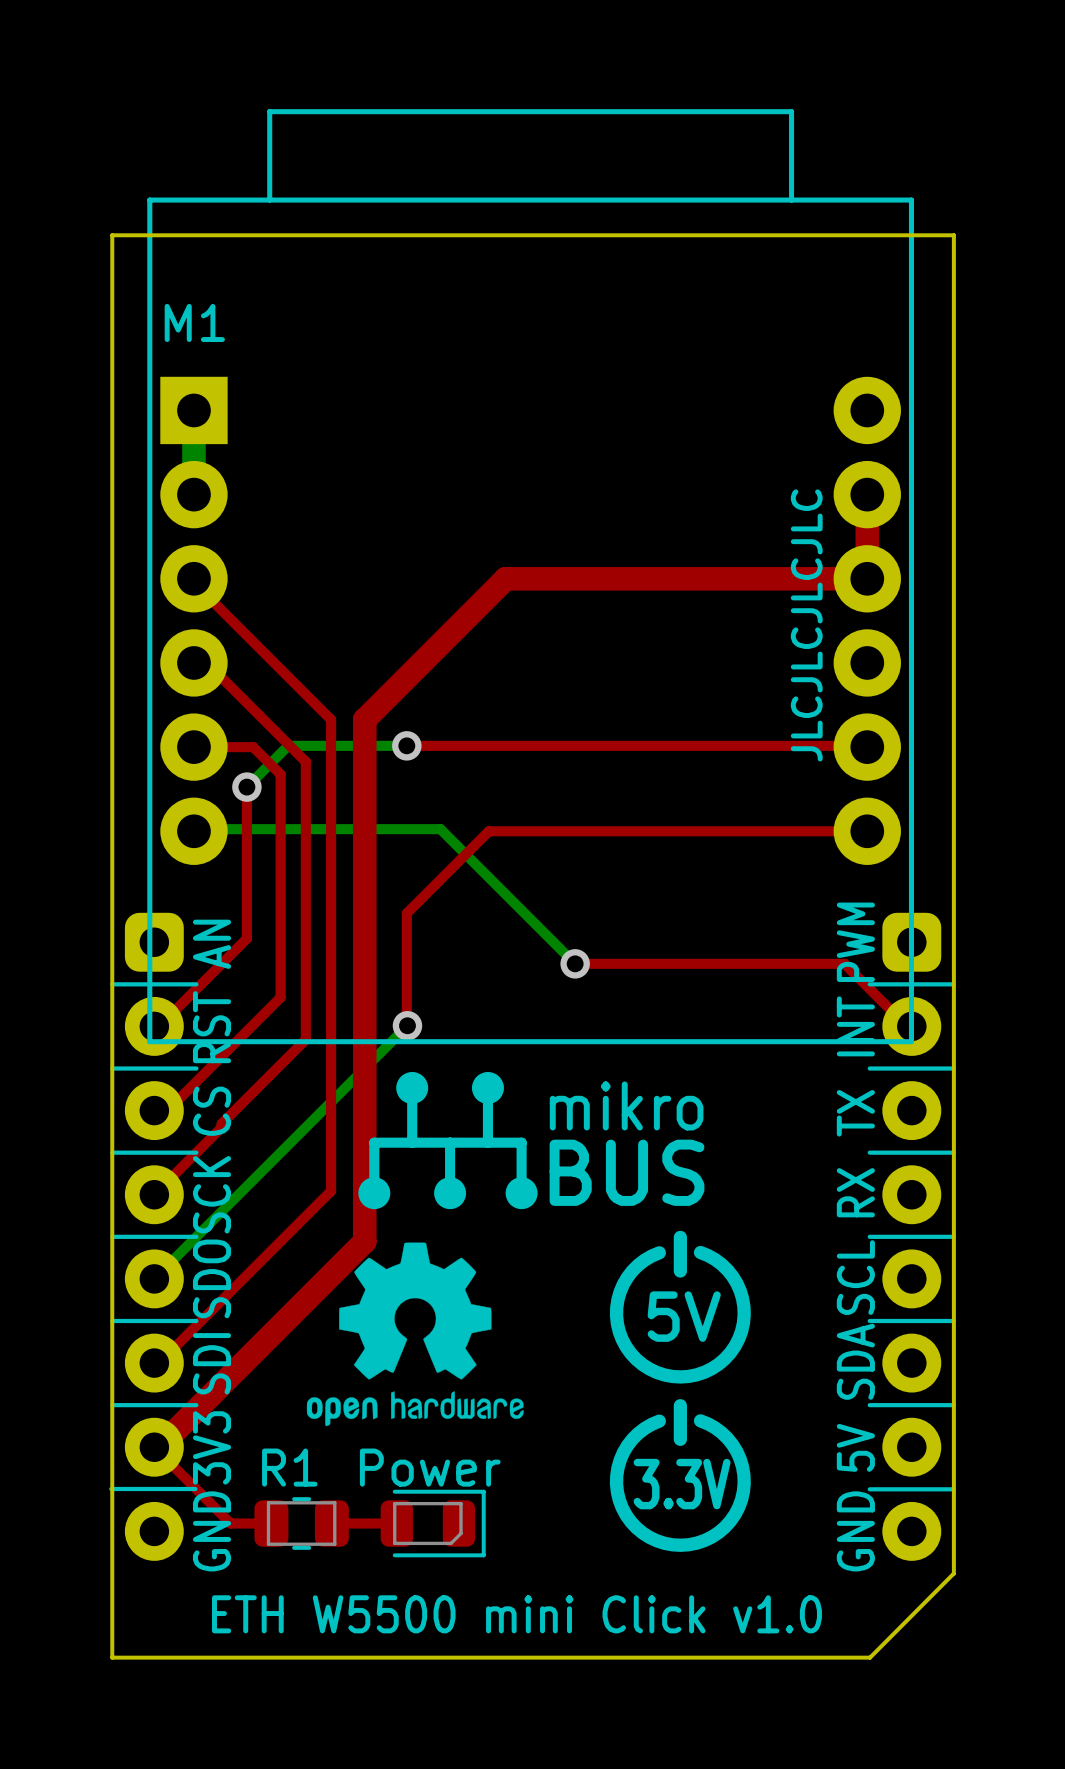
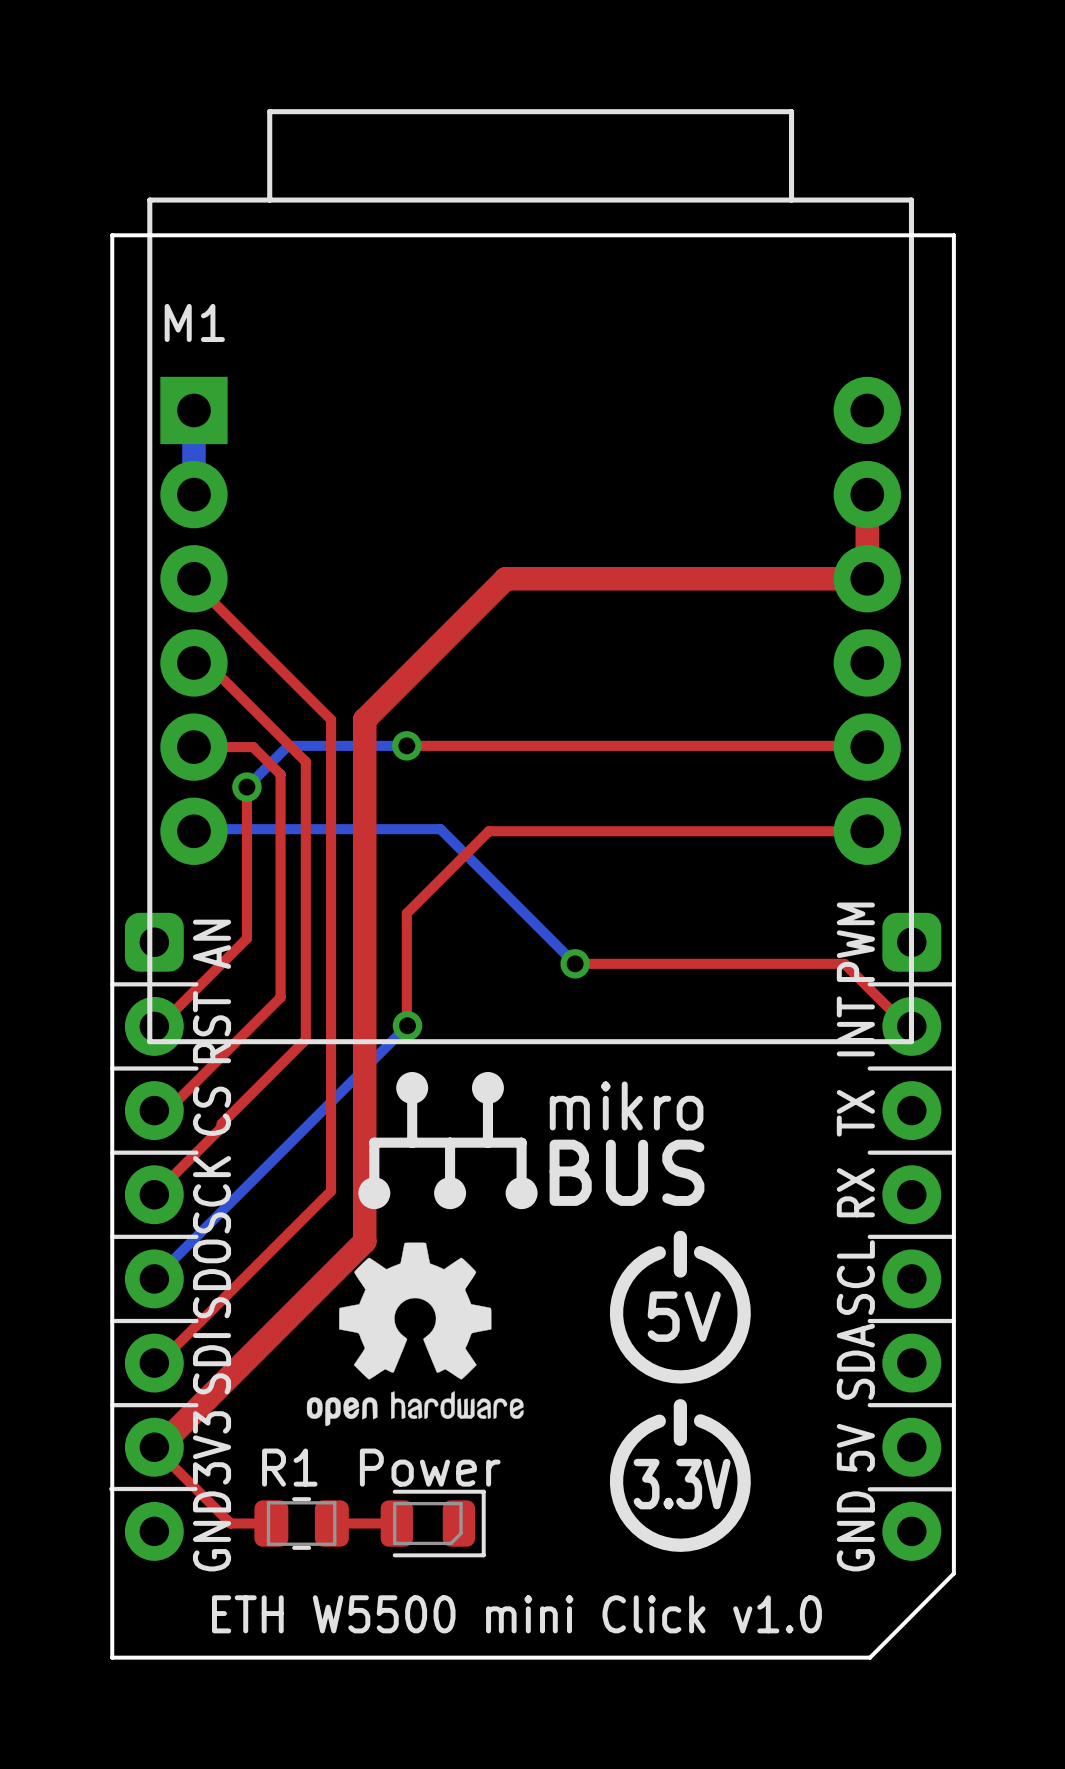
text: JLCJLCJLCJLC (806, 625) -> none

